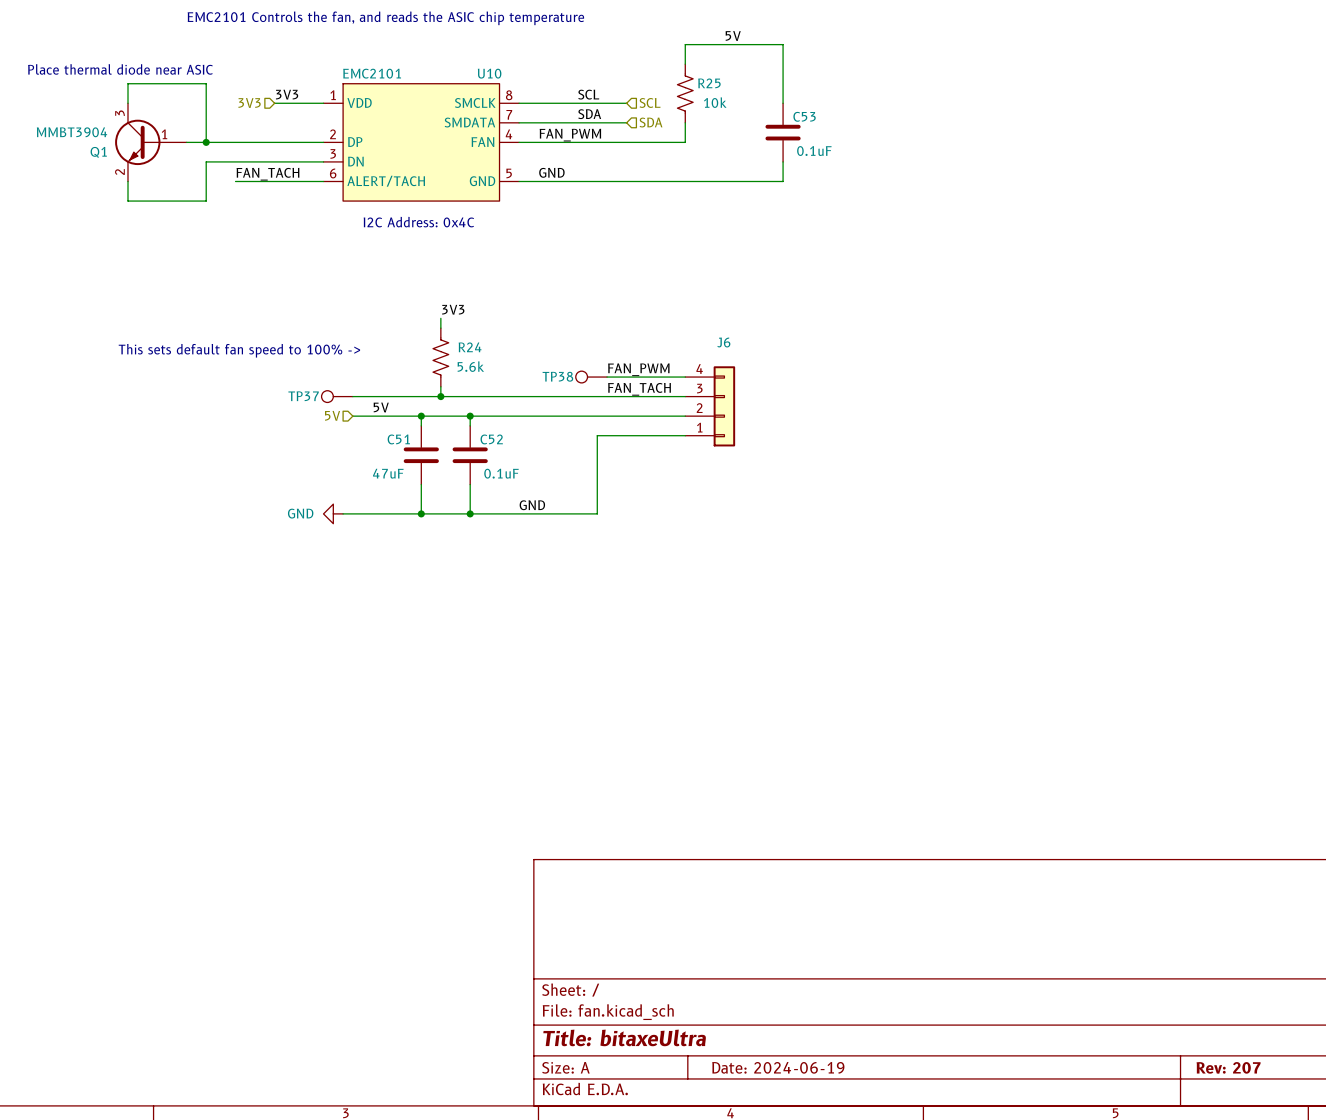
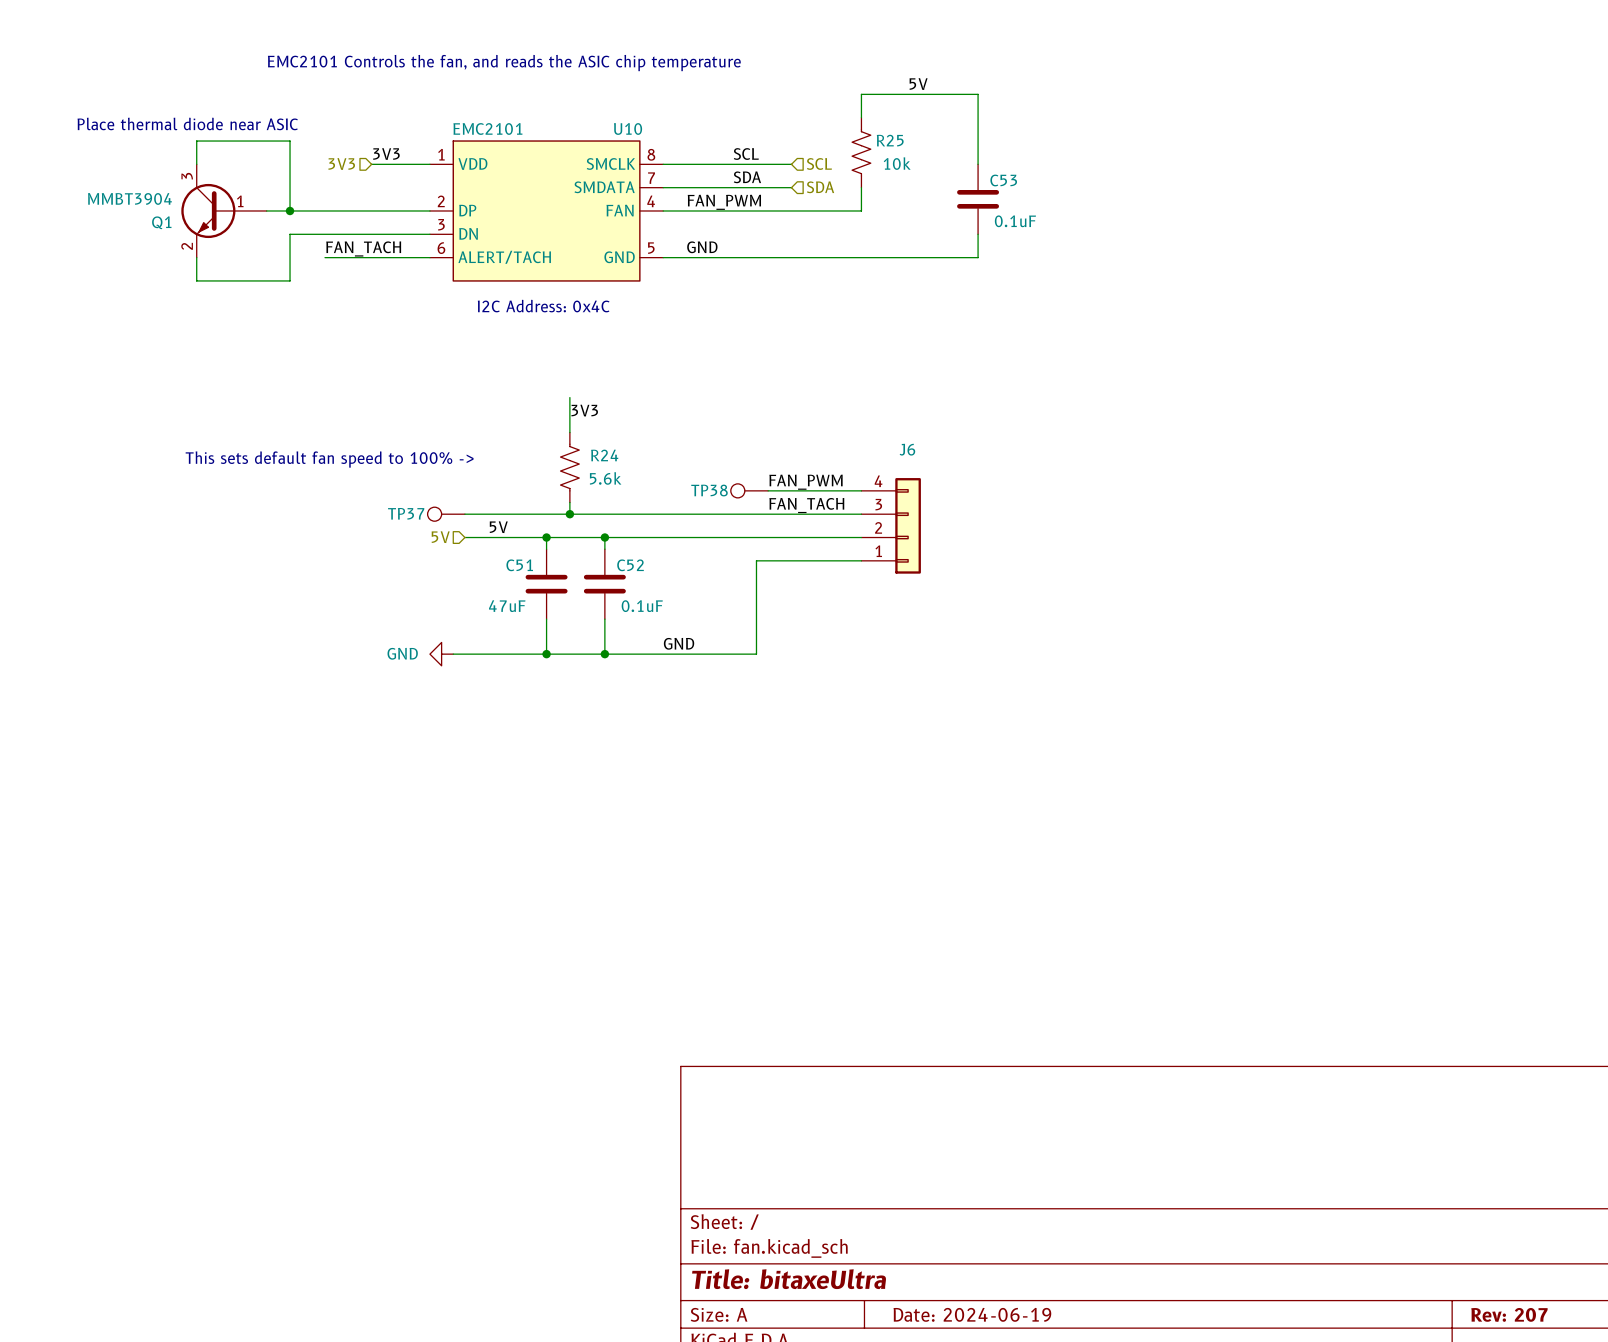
wire: none -> (569, 397) (569, 420)

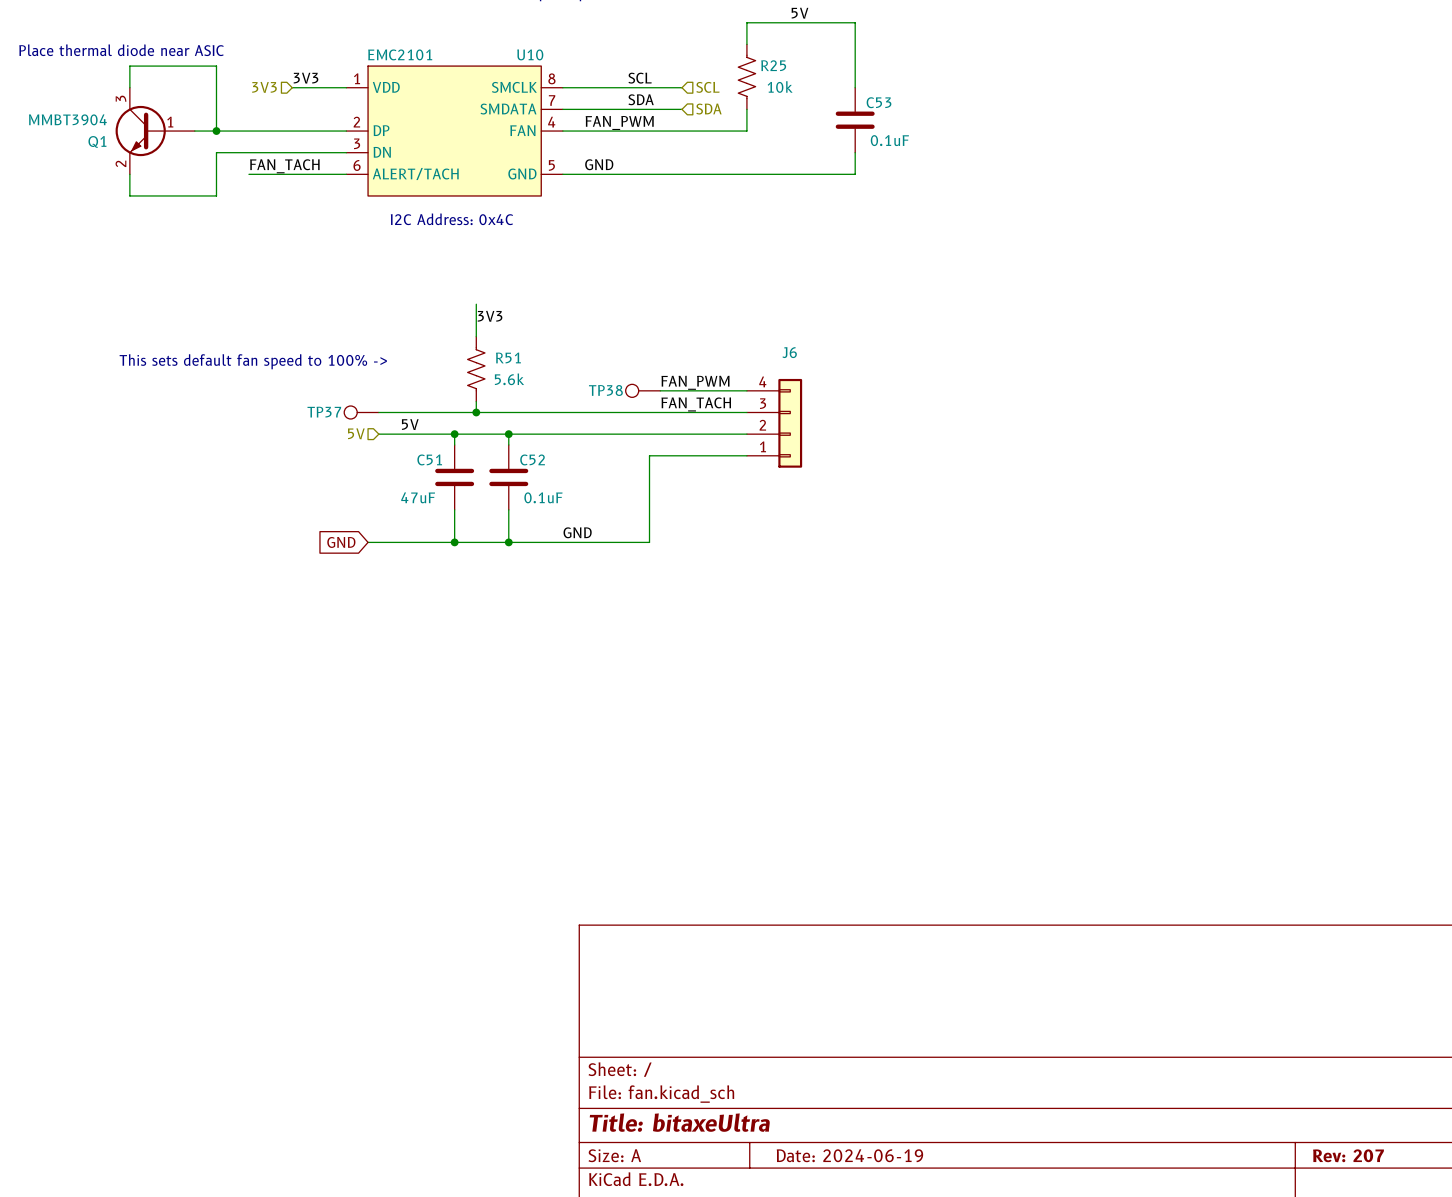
R24 name: R24 (604, 455) -> R51 (508, 357)
global label: none -> GND (341, 542)
power symbol: GND (441, 654) -> none

